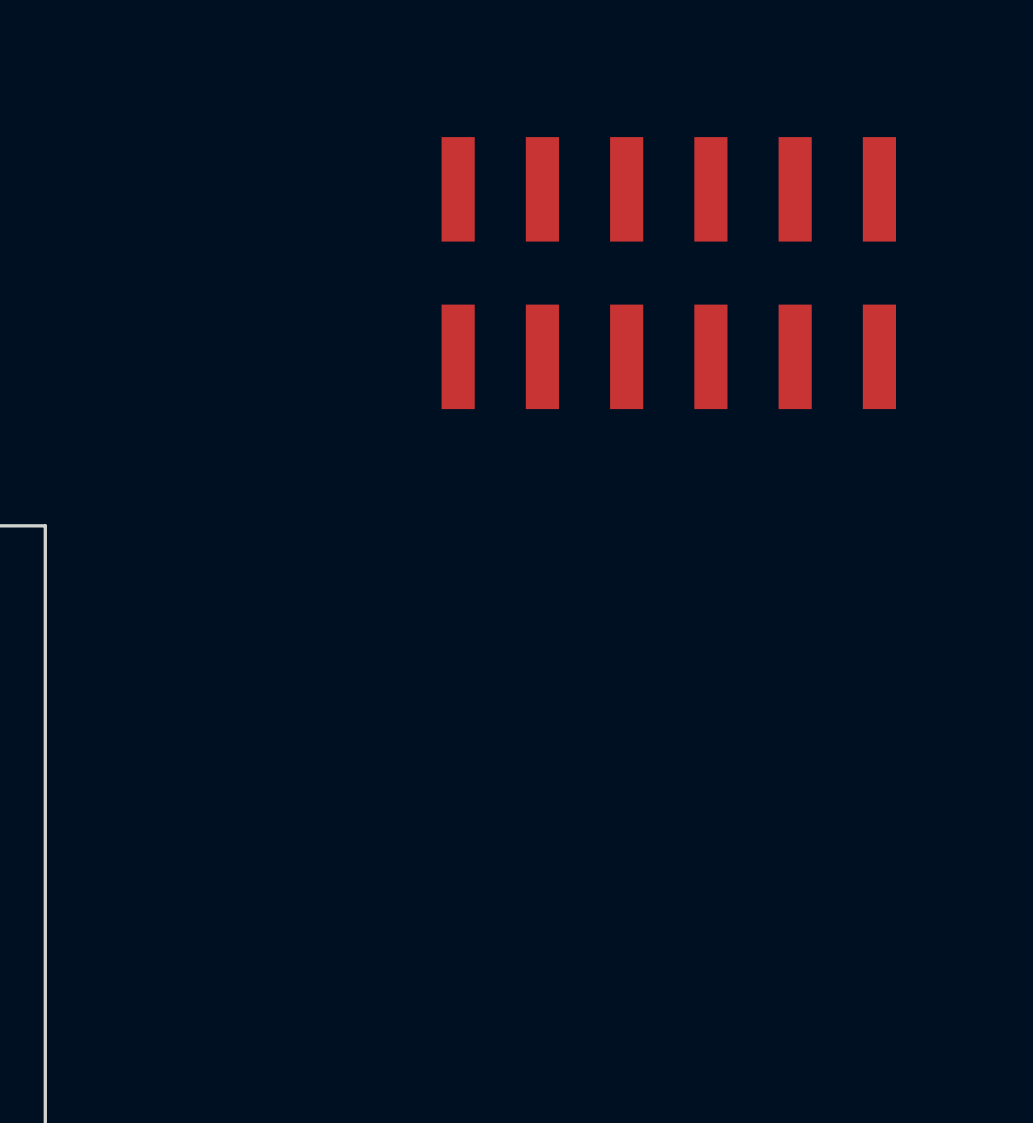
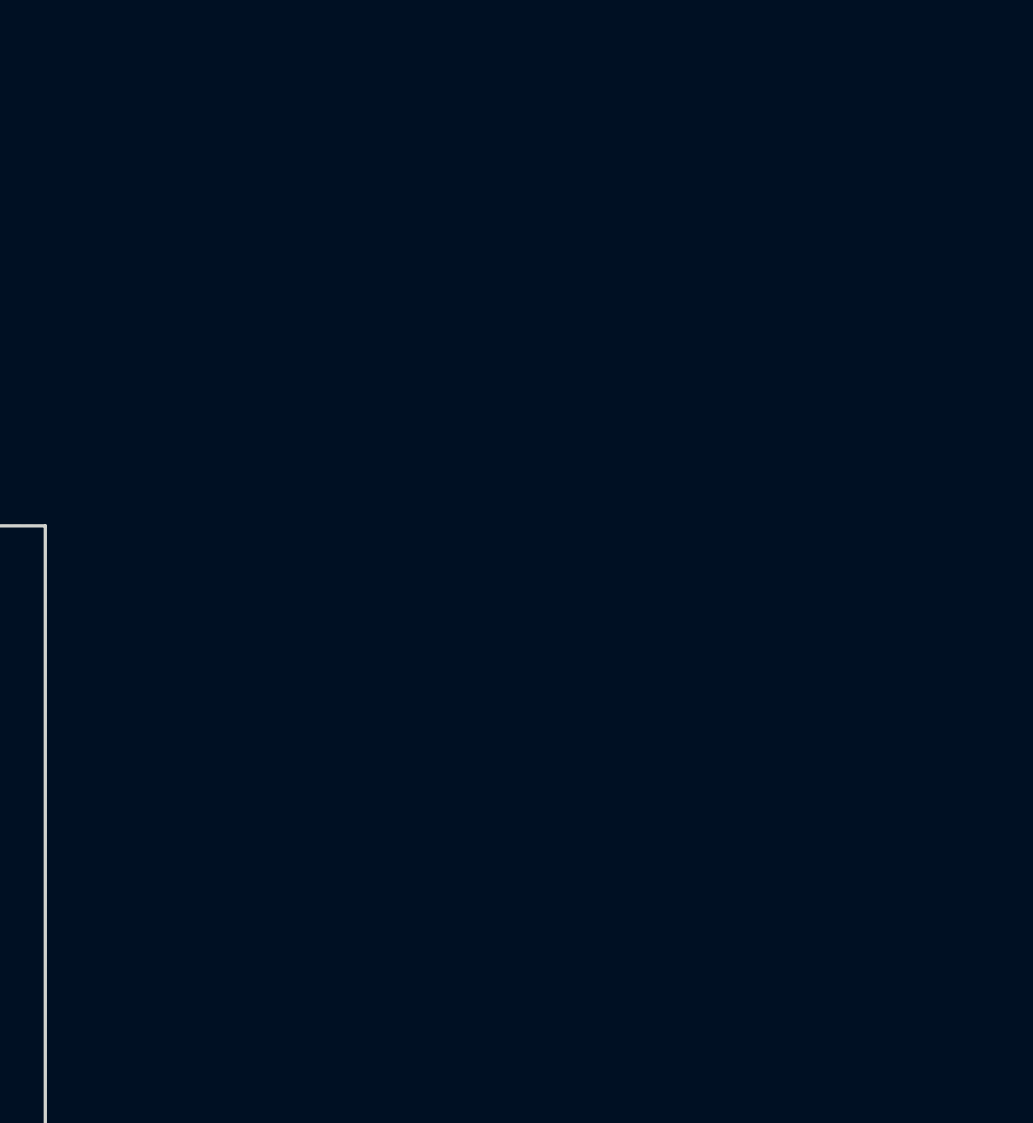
part: (668, 273) -> none

